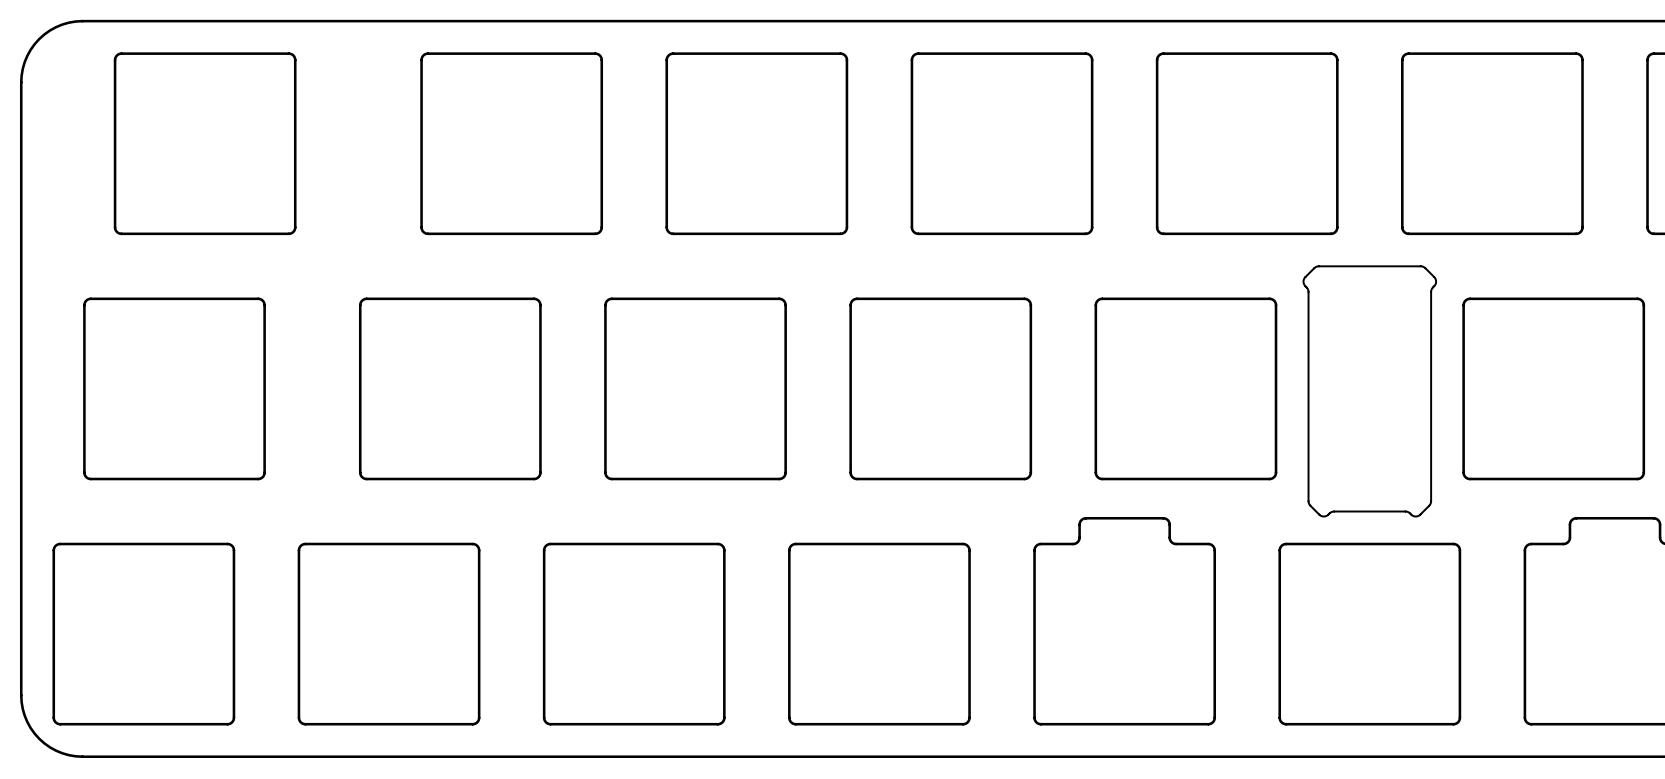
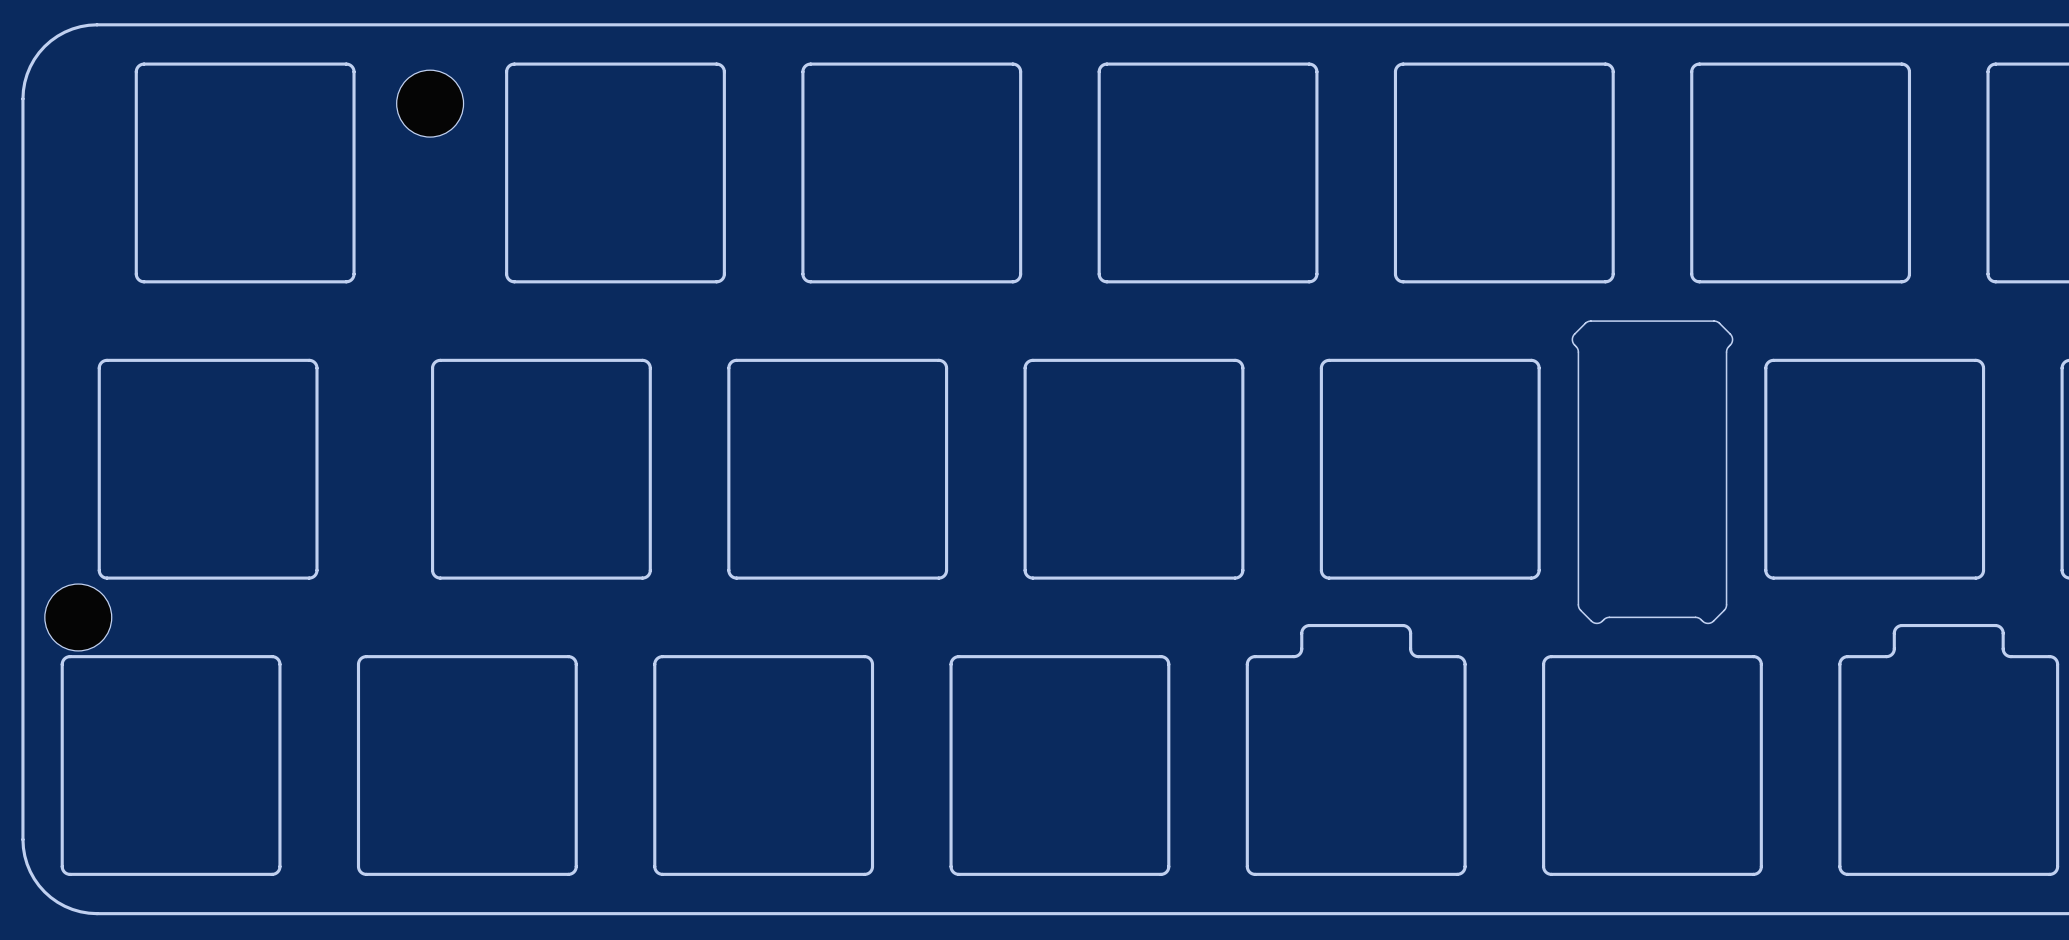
part: none -> (430, 103)
part: none -> (78, 617)

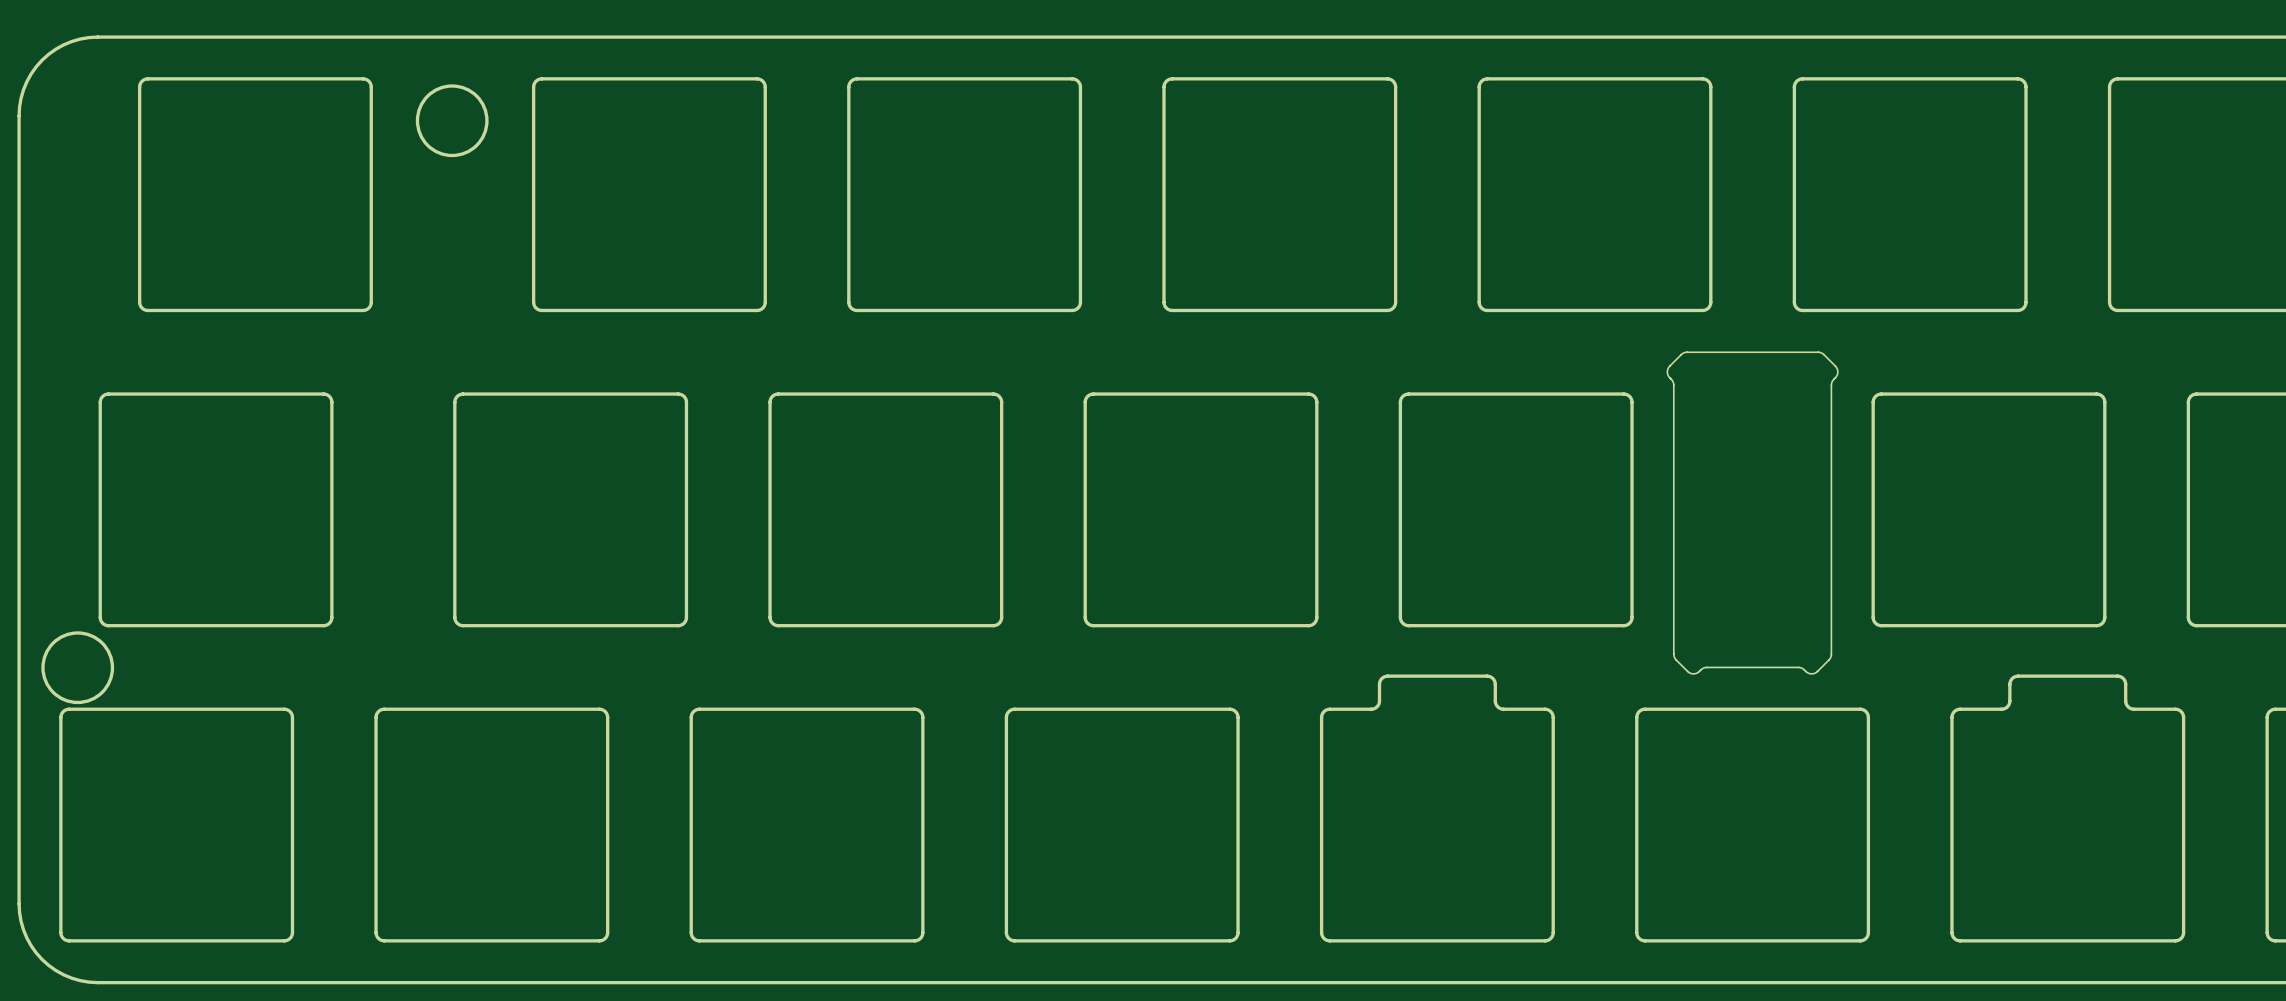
round board edge: none -> [415, 84, 489, 158]
part: (430, 103) -> none
round board edge: none -> [41, 631, 115, 705]
part: (78, 617) -> none

